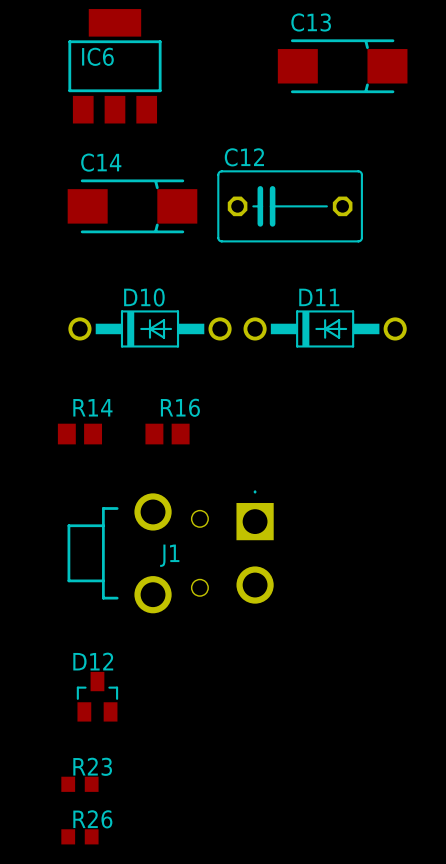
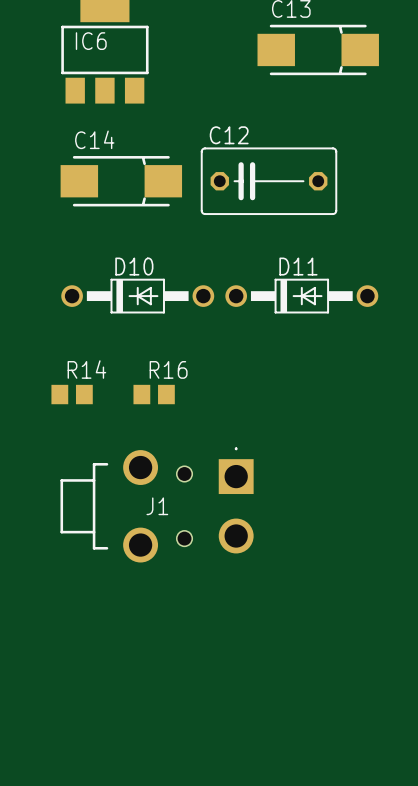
D12: (97, 696) -> none
R23: (79, 784) -> none
R26: (79, 836) -> none

